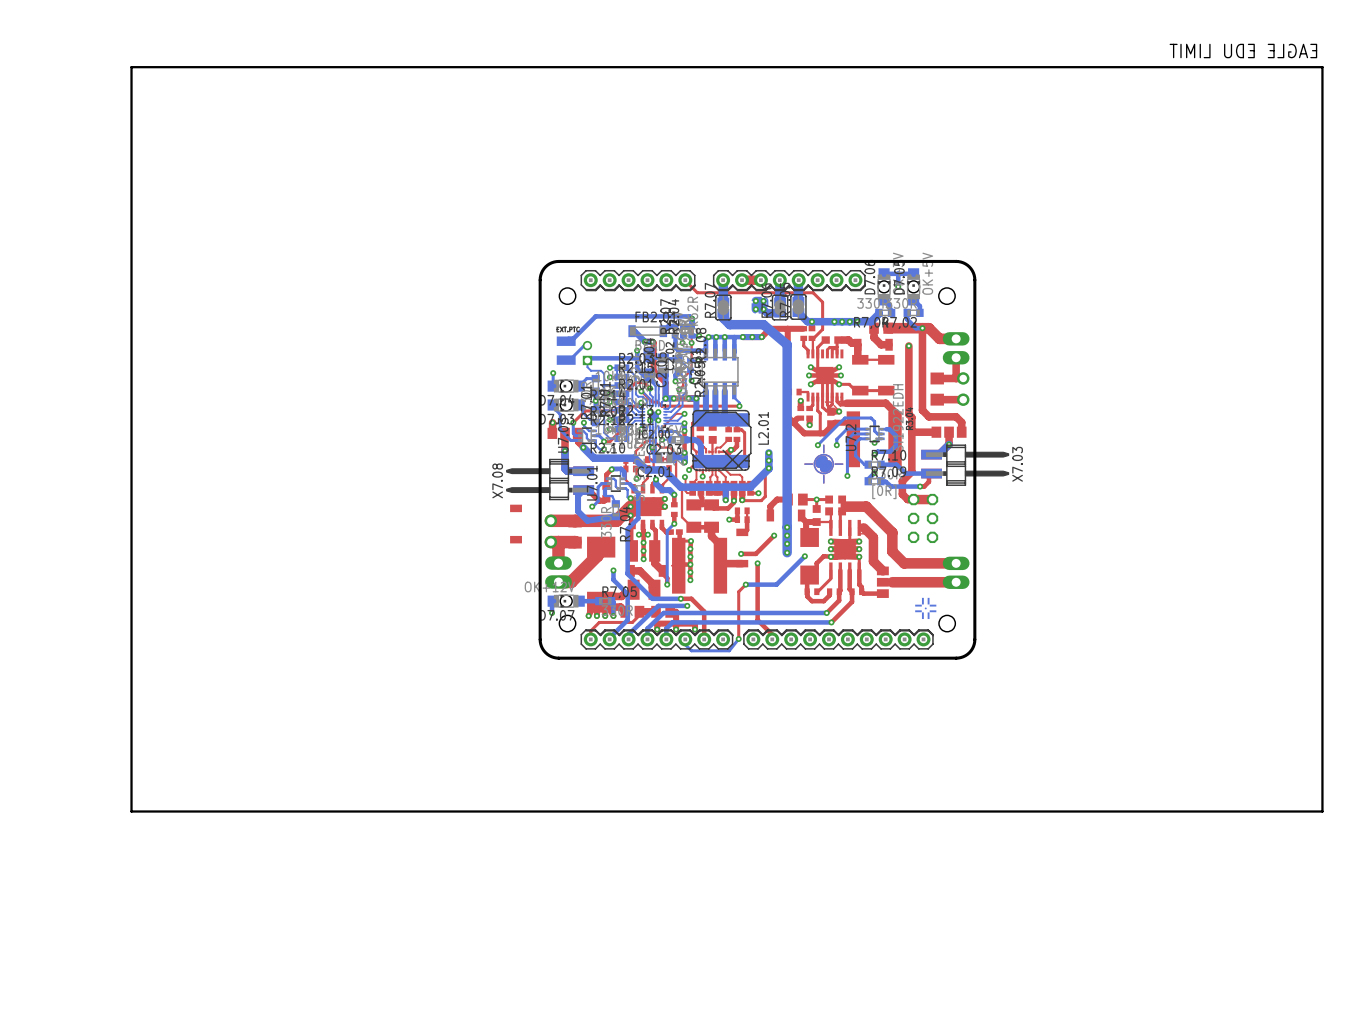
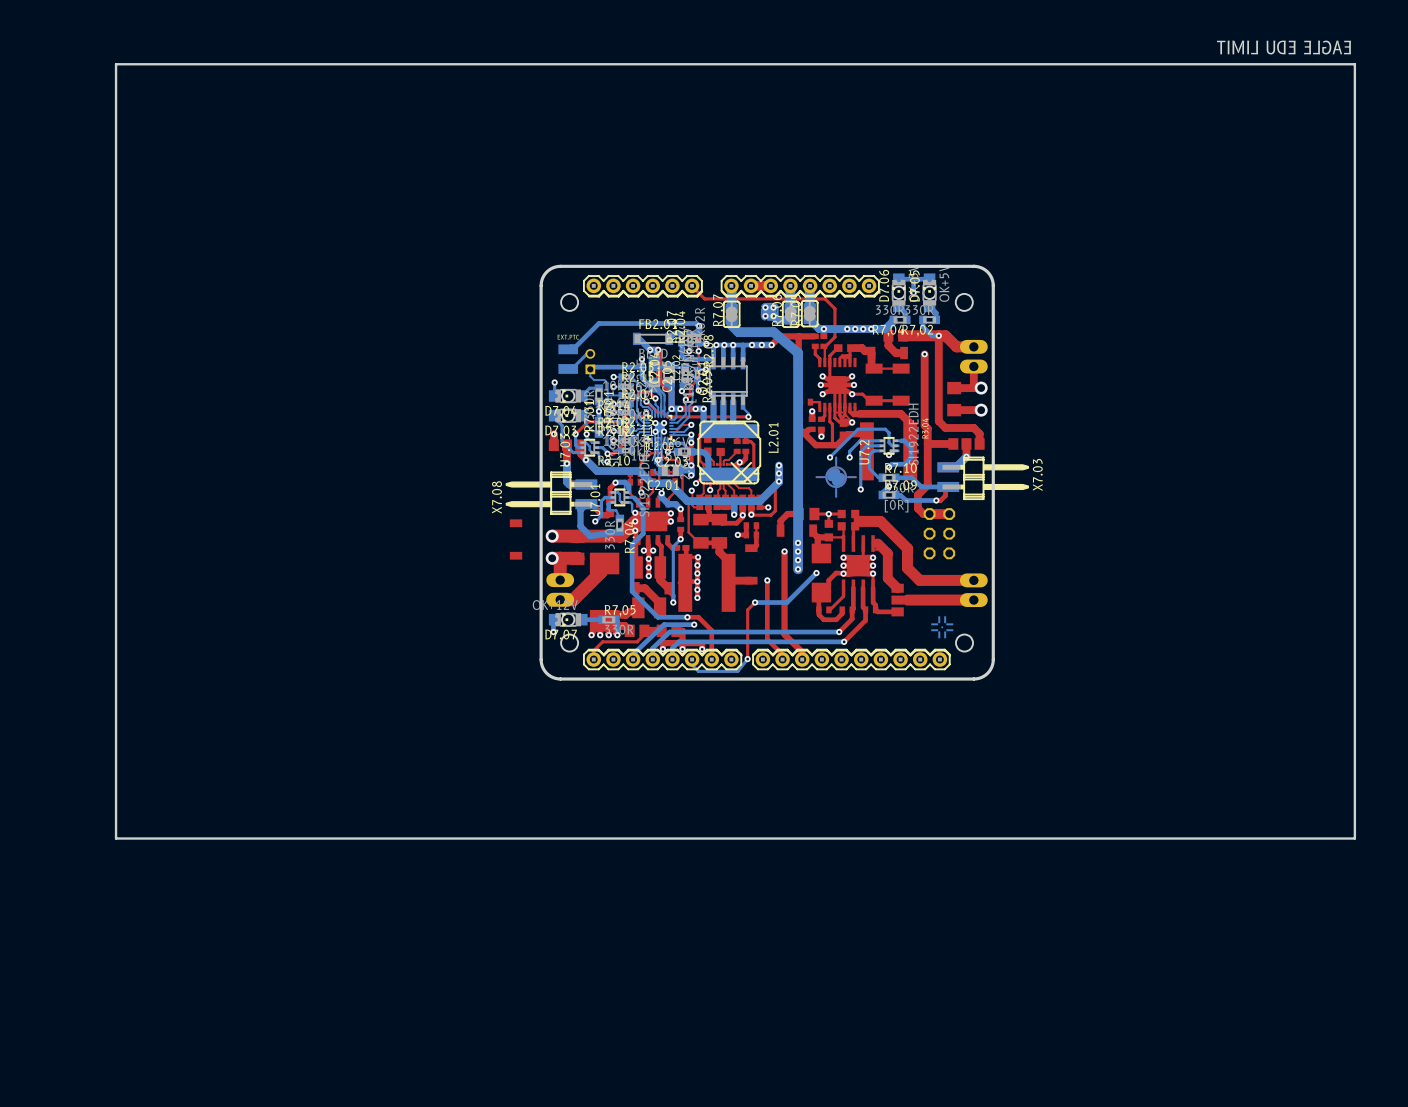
top track: (774, 535) (755, 553) (741, 553) -> (784, 551) (784, 634) (802, 652) (802, 659)
via: (741, 553) -> none
bottom track: (613, 570) (613, 579) (627, 594) (627, 620) (609, 639) -> none
via: (613, 570) -> none

